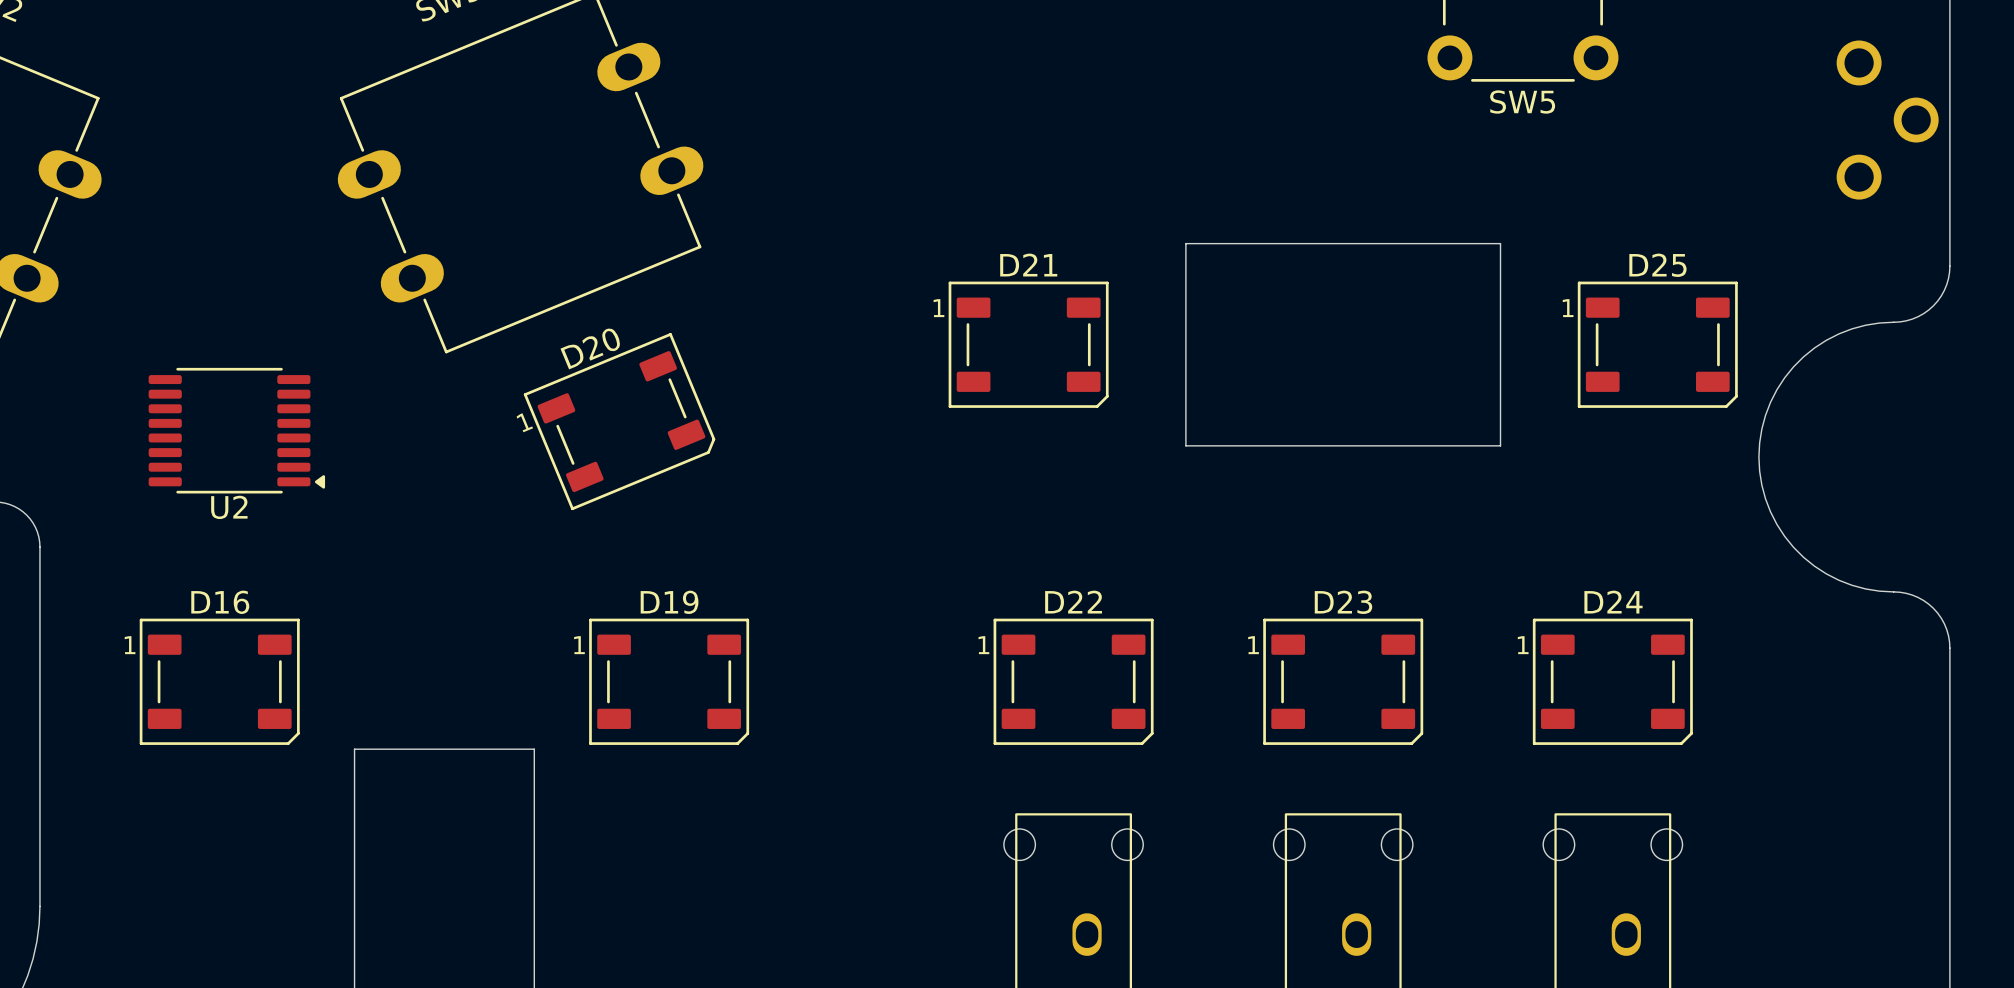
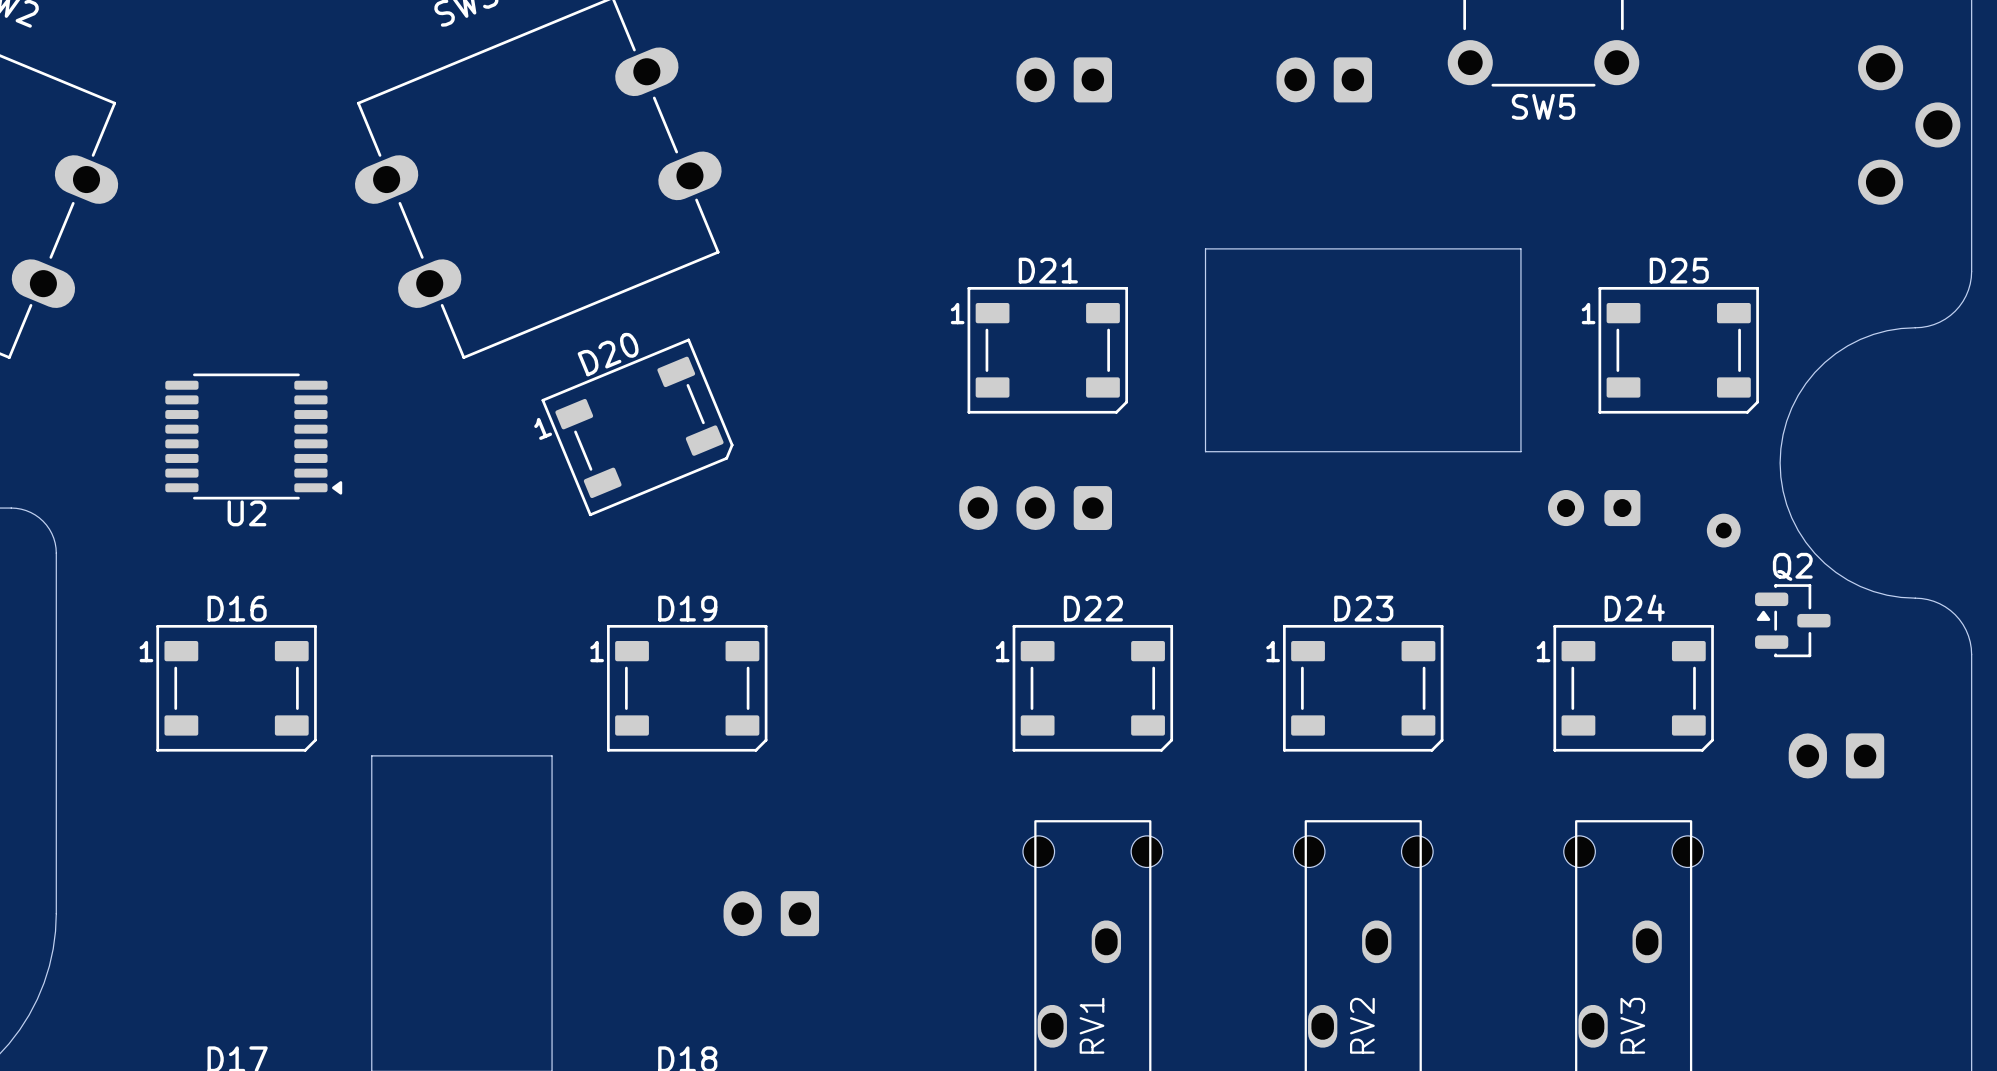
part: none -> (1064, 79)
part: none -> (1324, 79)
part: none -> (1035, 508)
part: none -> (1594, 508)
part: none -> (1723, 530)
Q2: none -> (1792, 620)
part: none -> (1836, 755)
part: none -> (771, 913)

